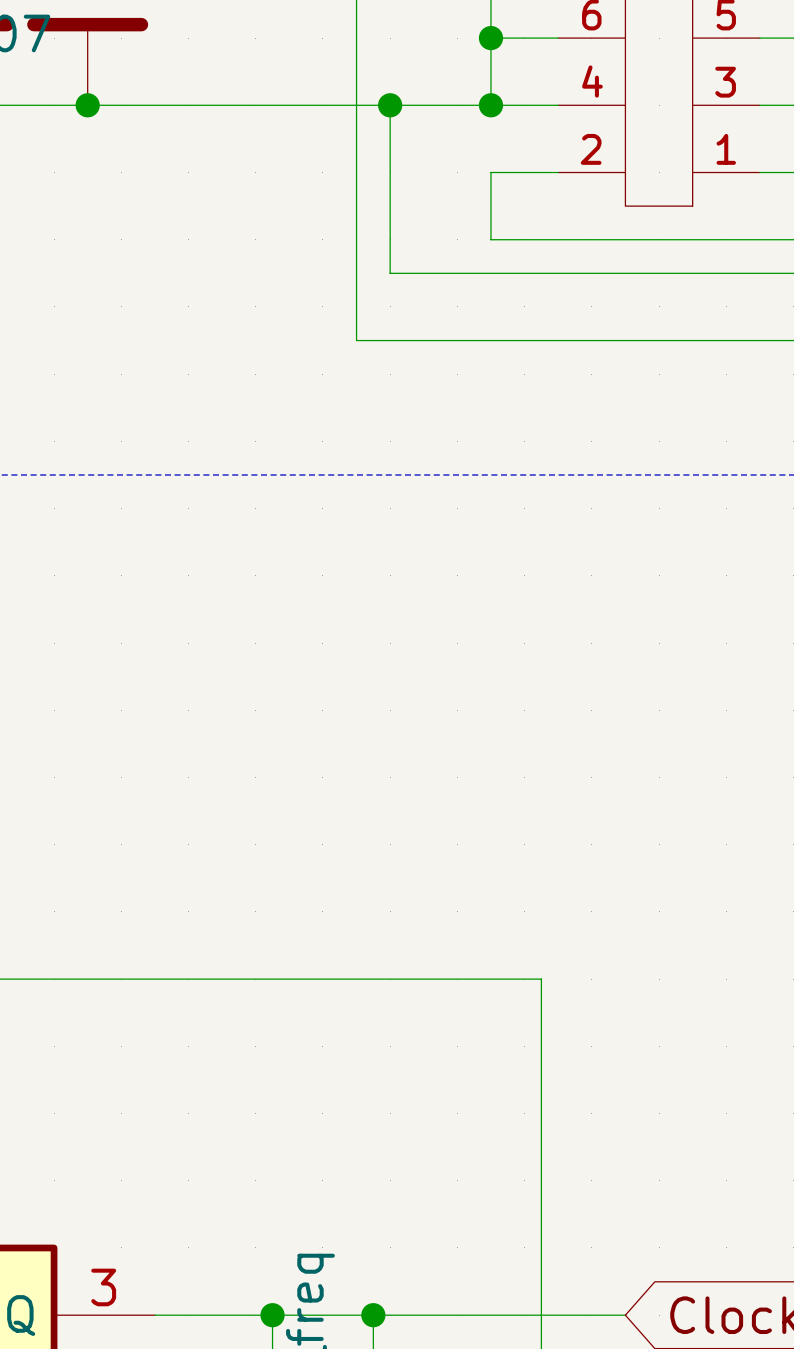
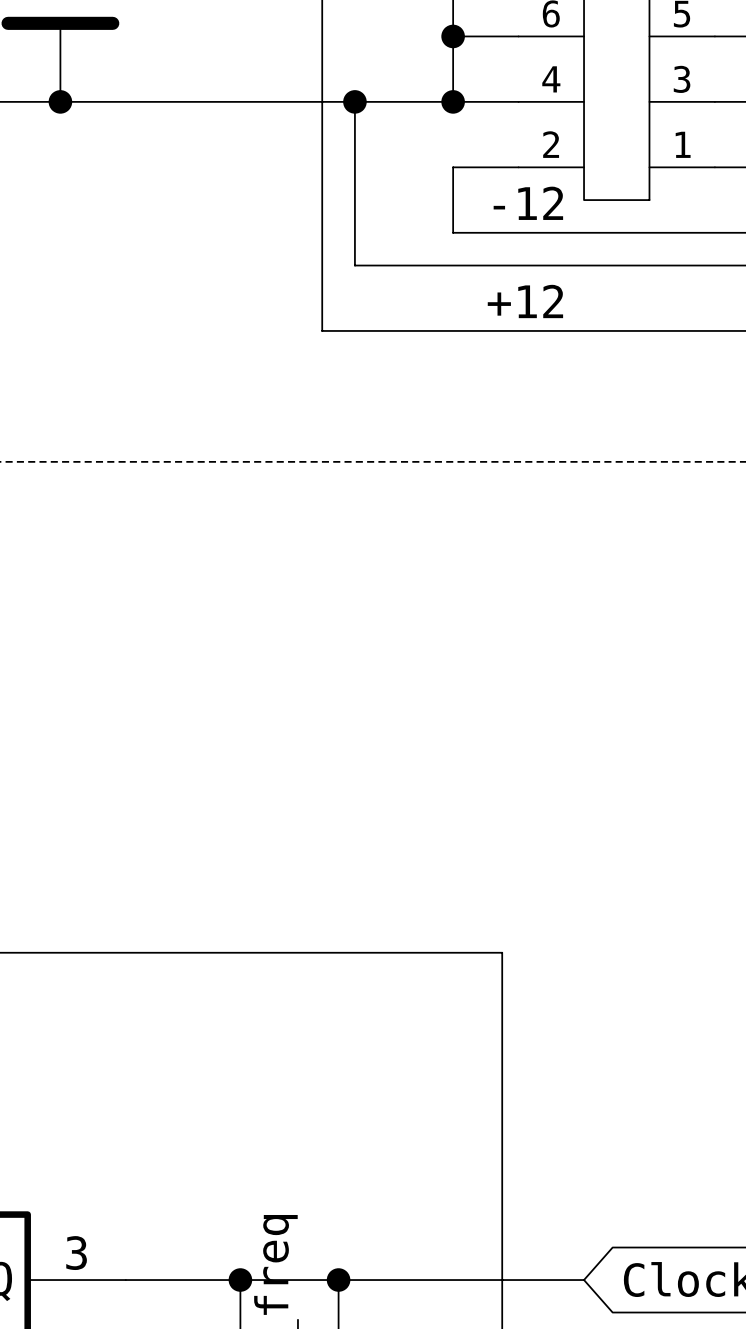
label: none -> -12 (528, 203)
label: none -> +12 (525, 301)

